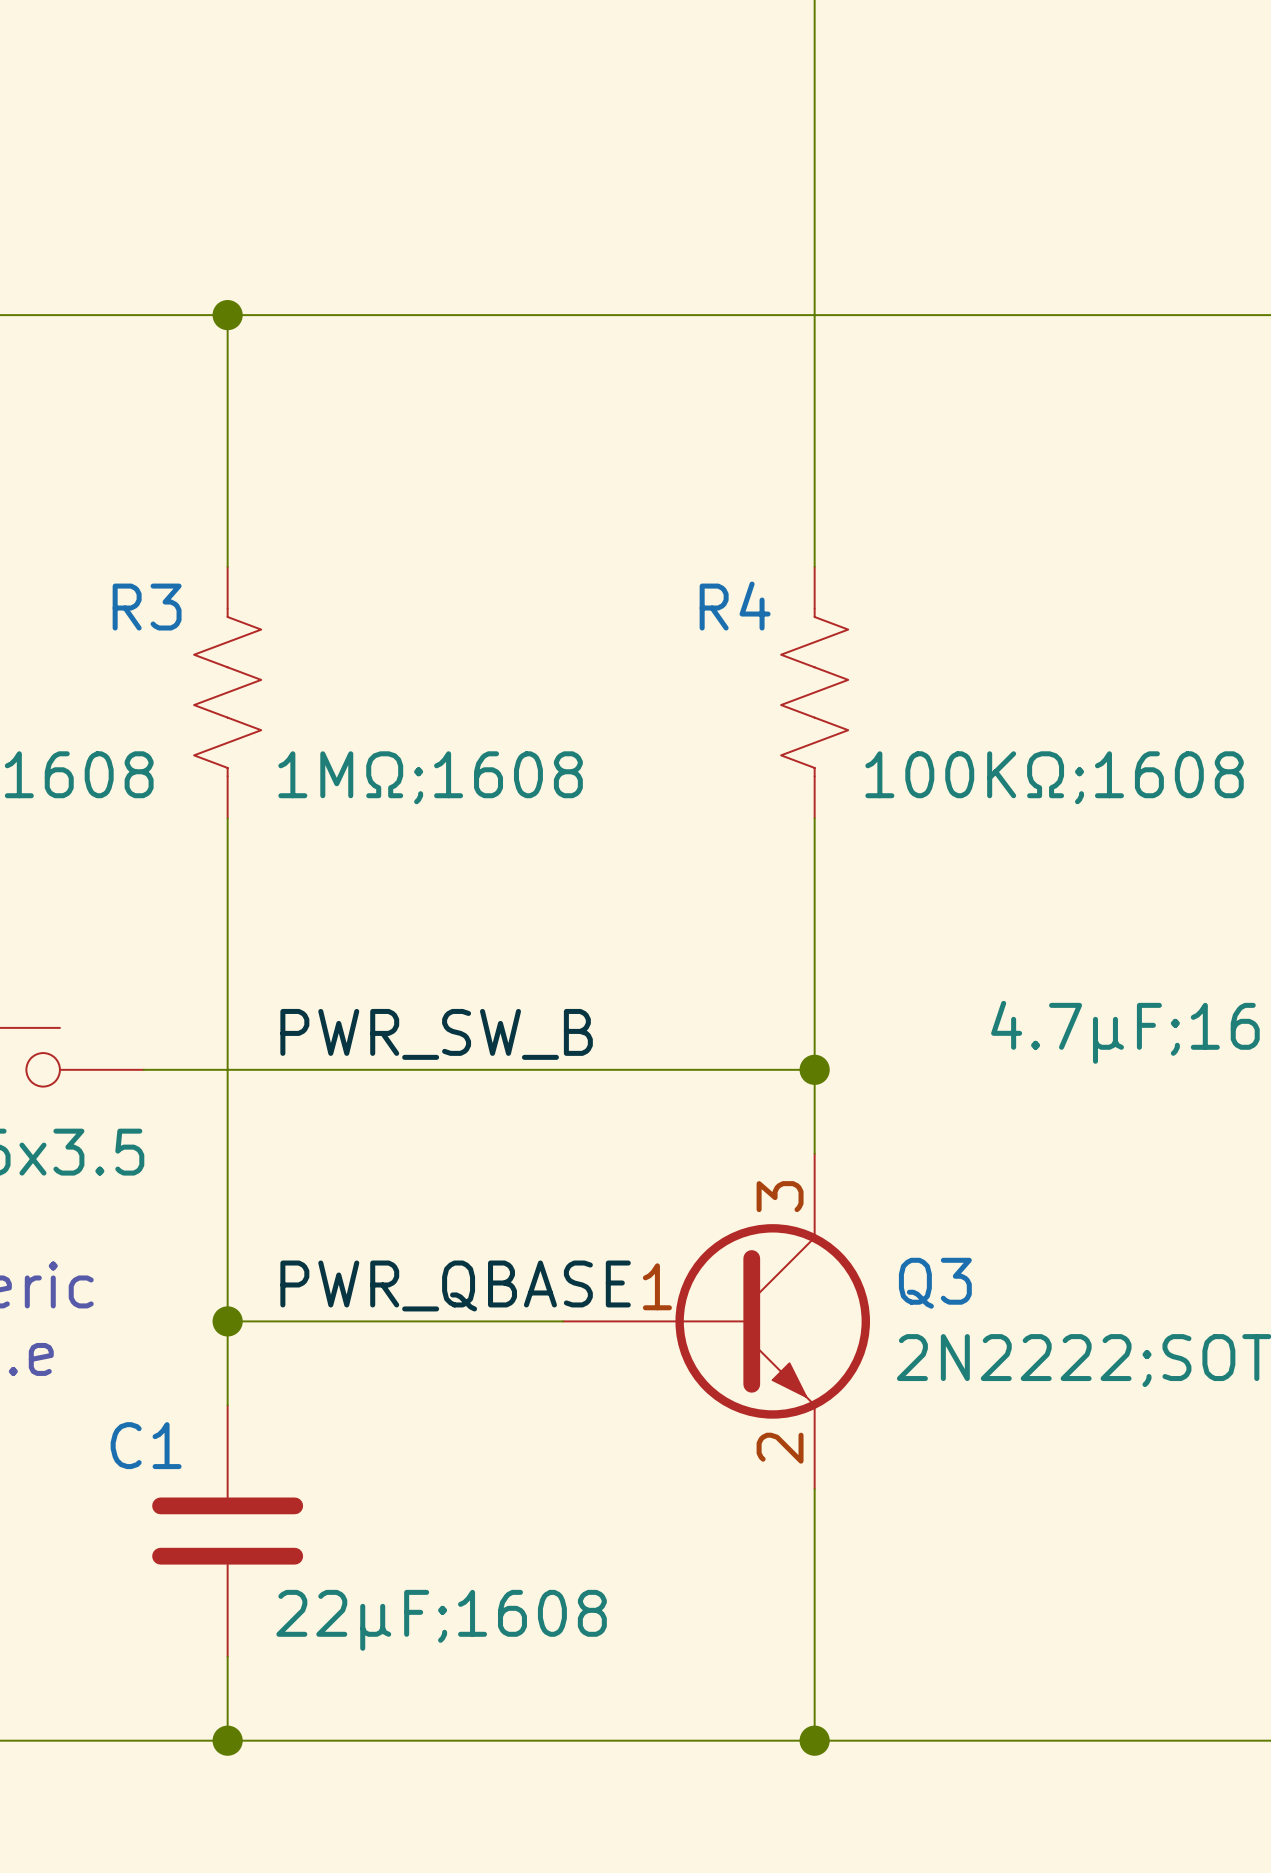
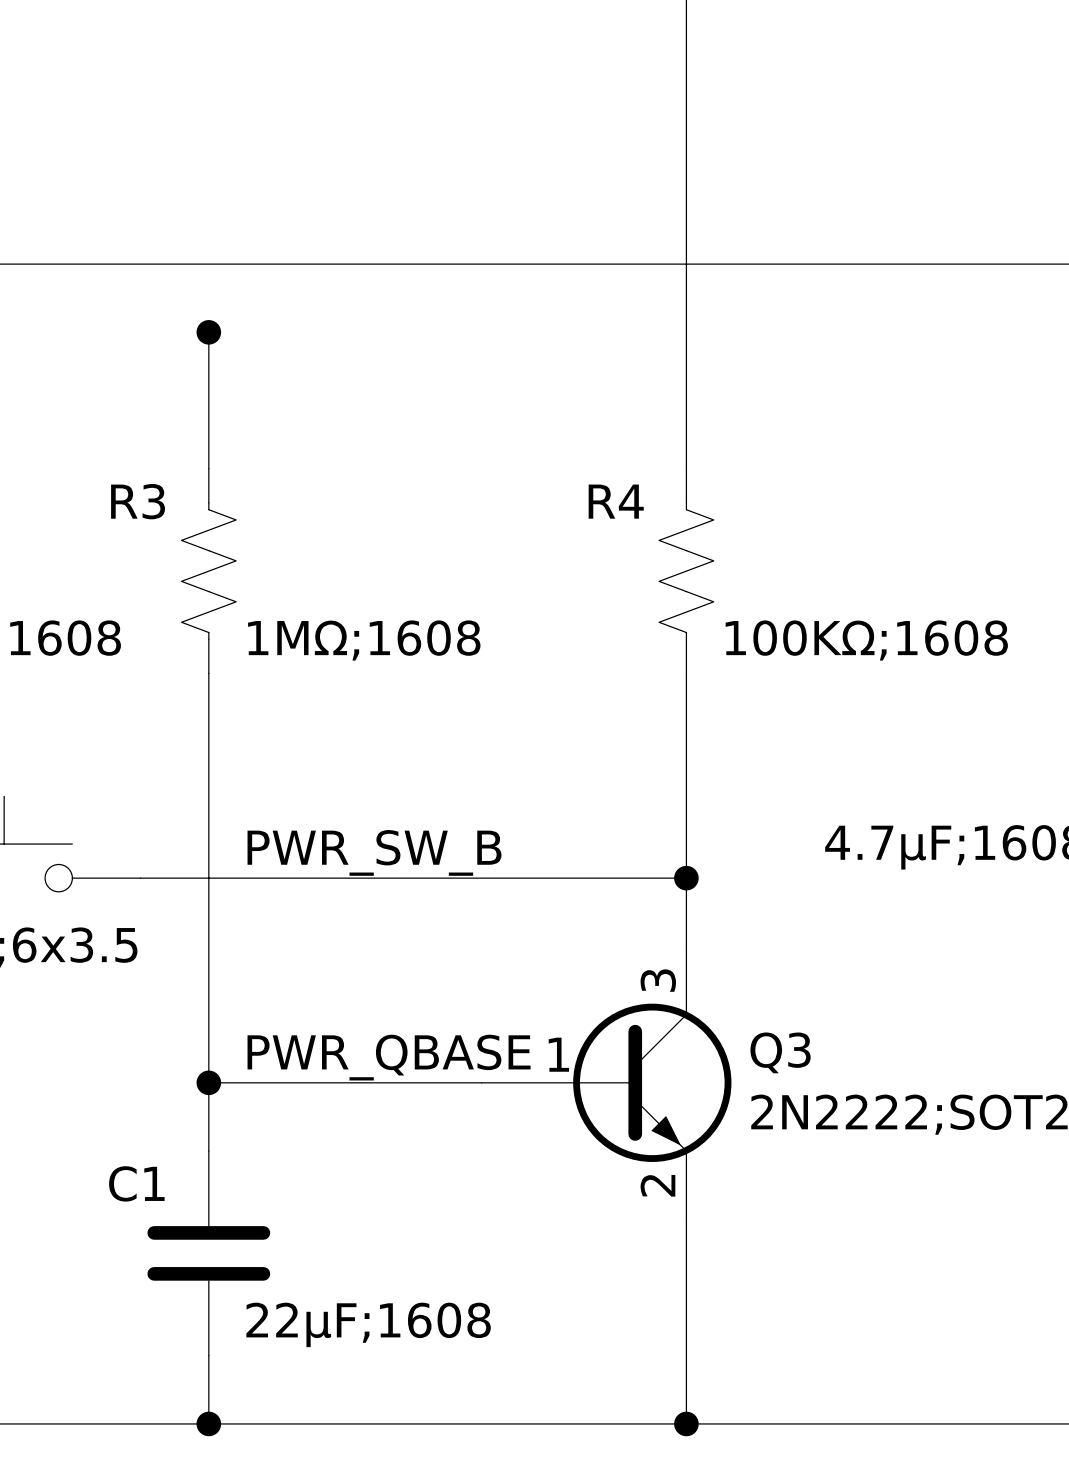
wire: (227, 315) (227, 398) -> none
junction position: (227, 315) -> (208, 332)

